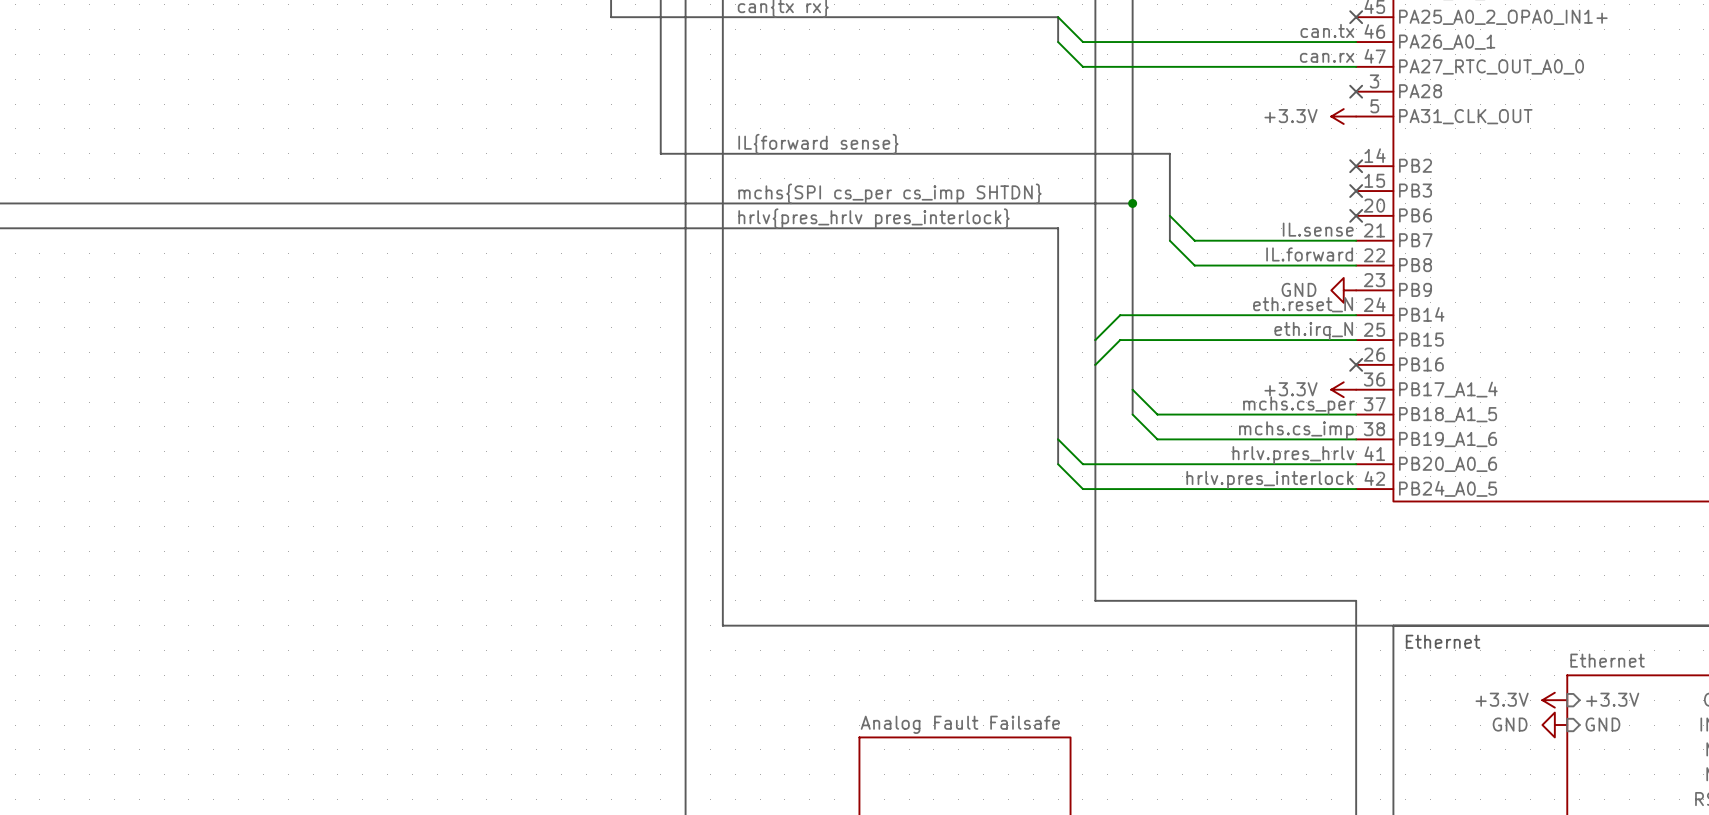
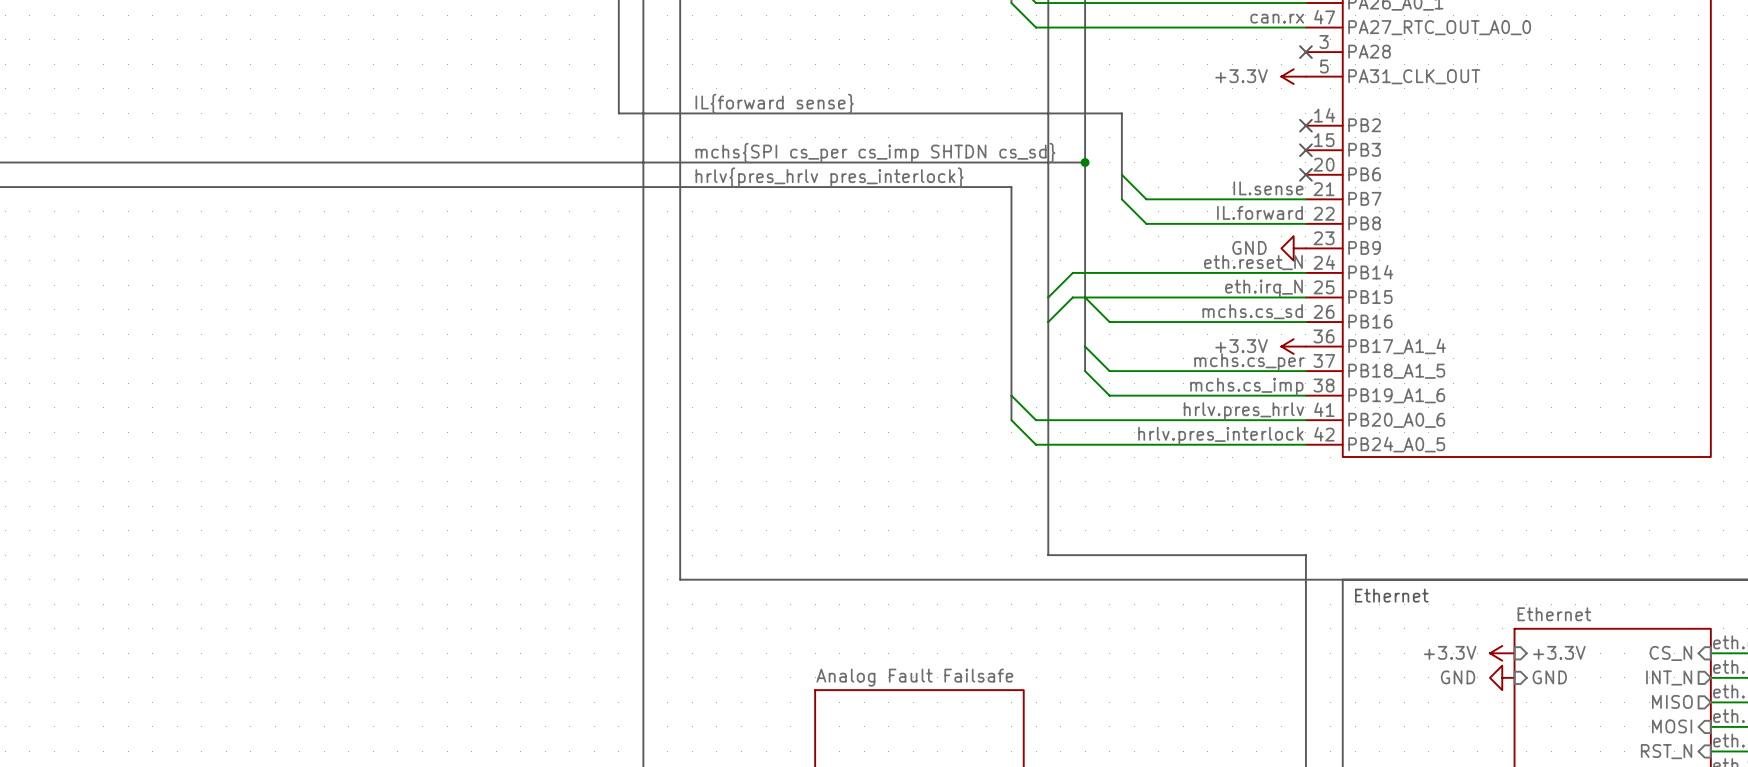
label: mchs{SPI cs_per cs_imp SHTDN} (889, 193) -> mchs{SPI cs_per cs_imp SHTDN cs_sd} (875, 153)
wire: none -> (1085, 297) (1109, 322) (1305, 322)
label: none -> mchs.cs_sd (1252, 311)
no-connect mark: (1356, 364) -> none

